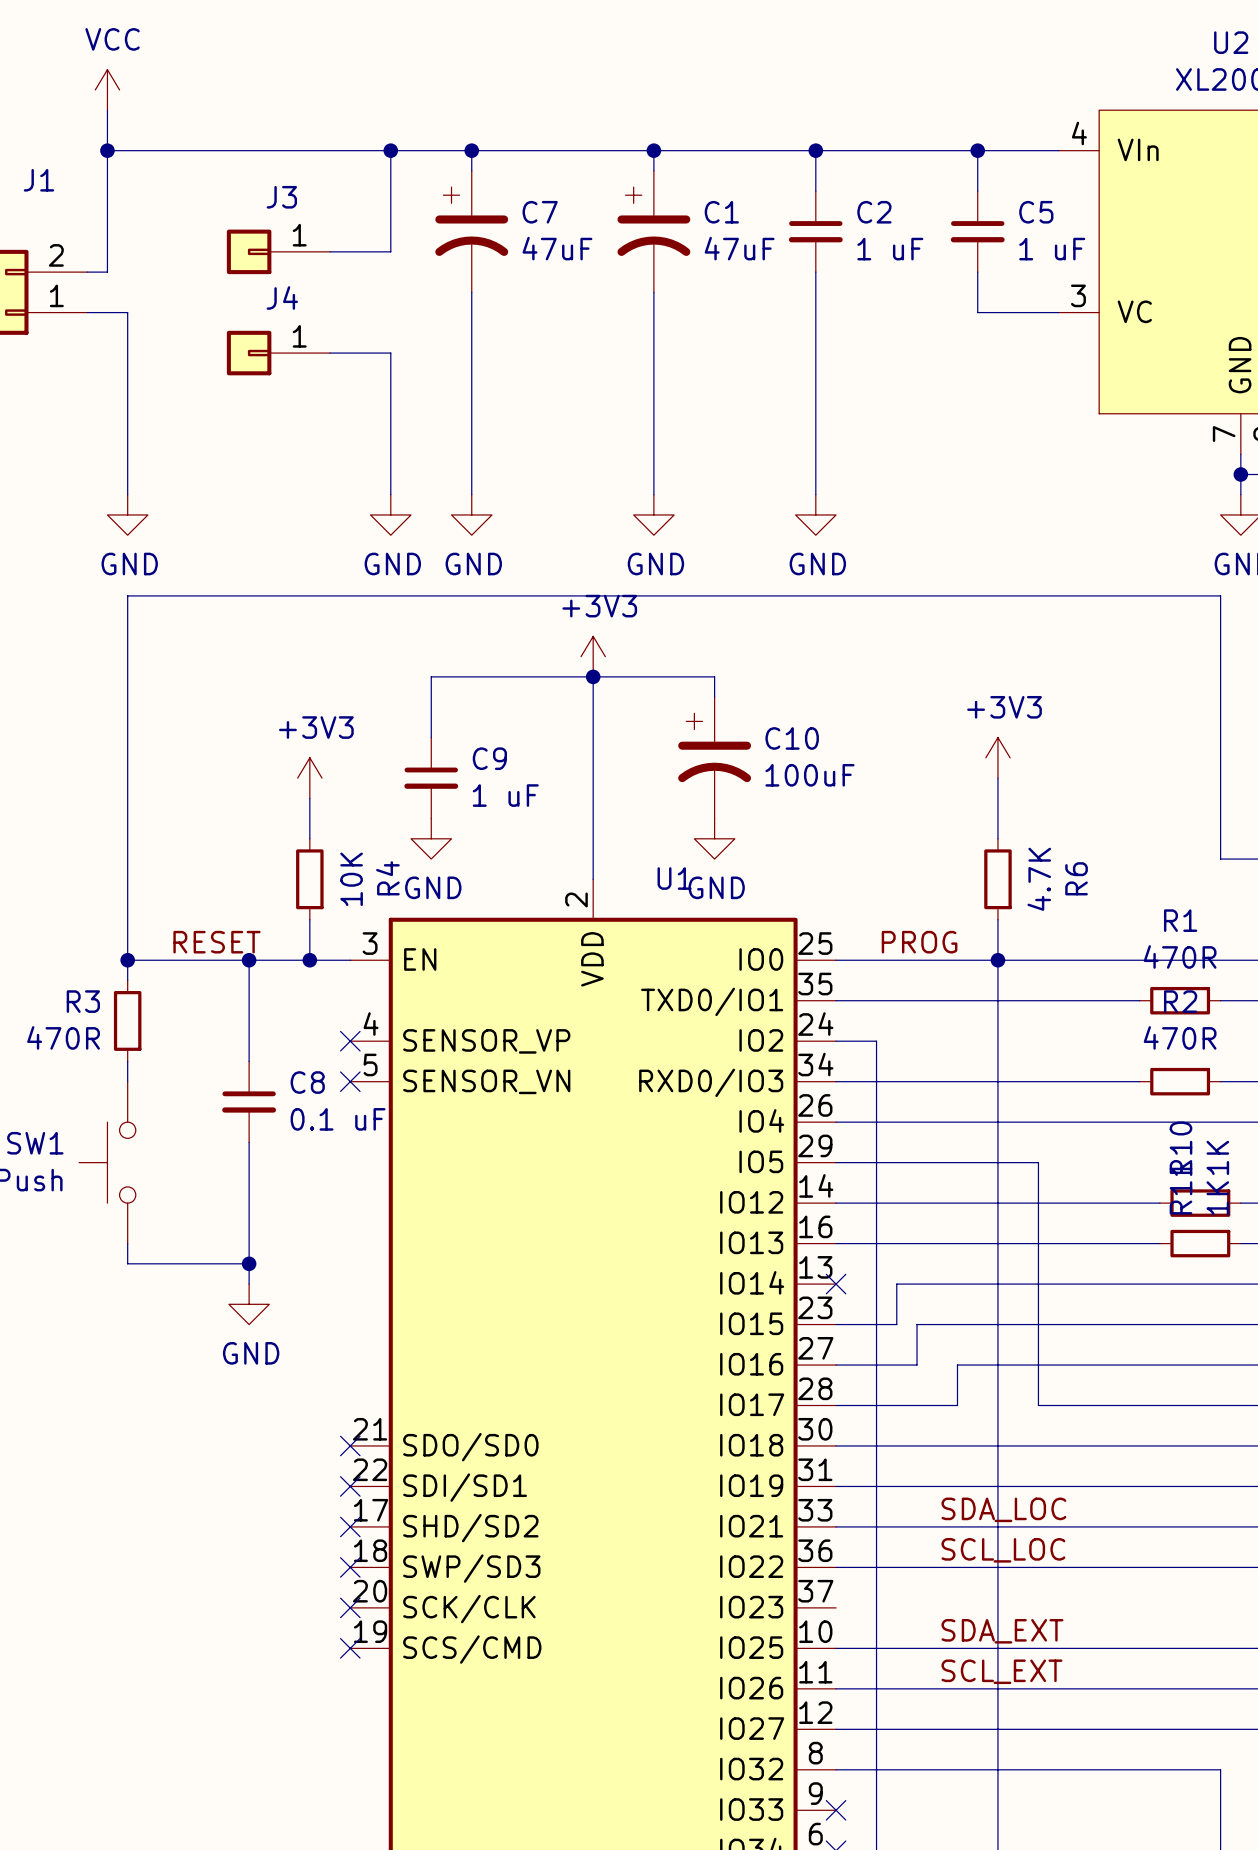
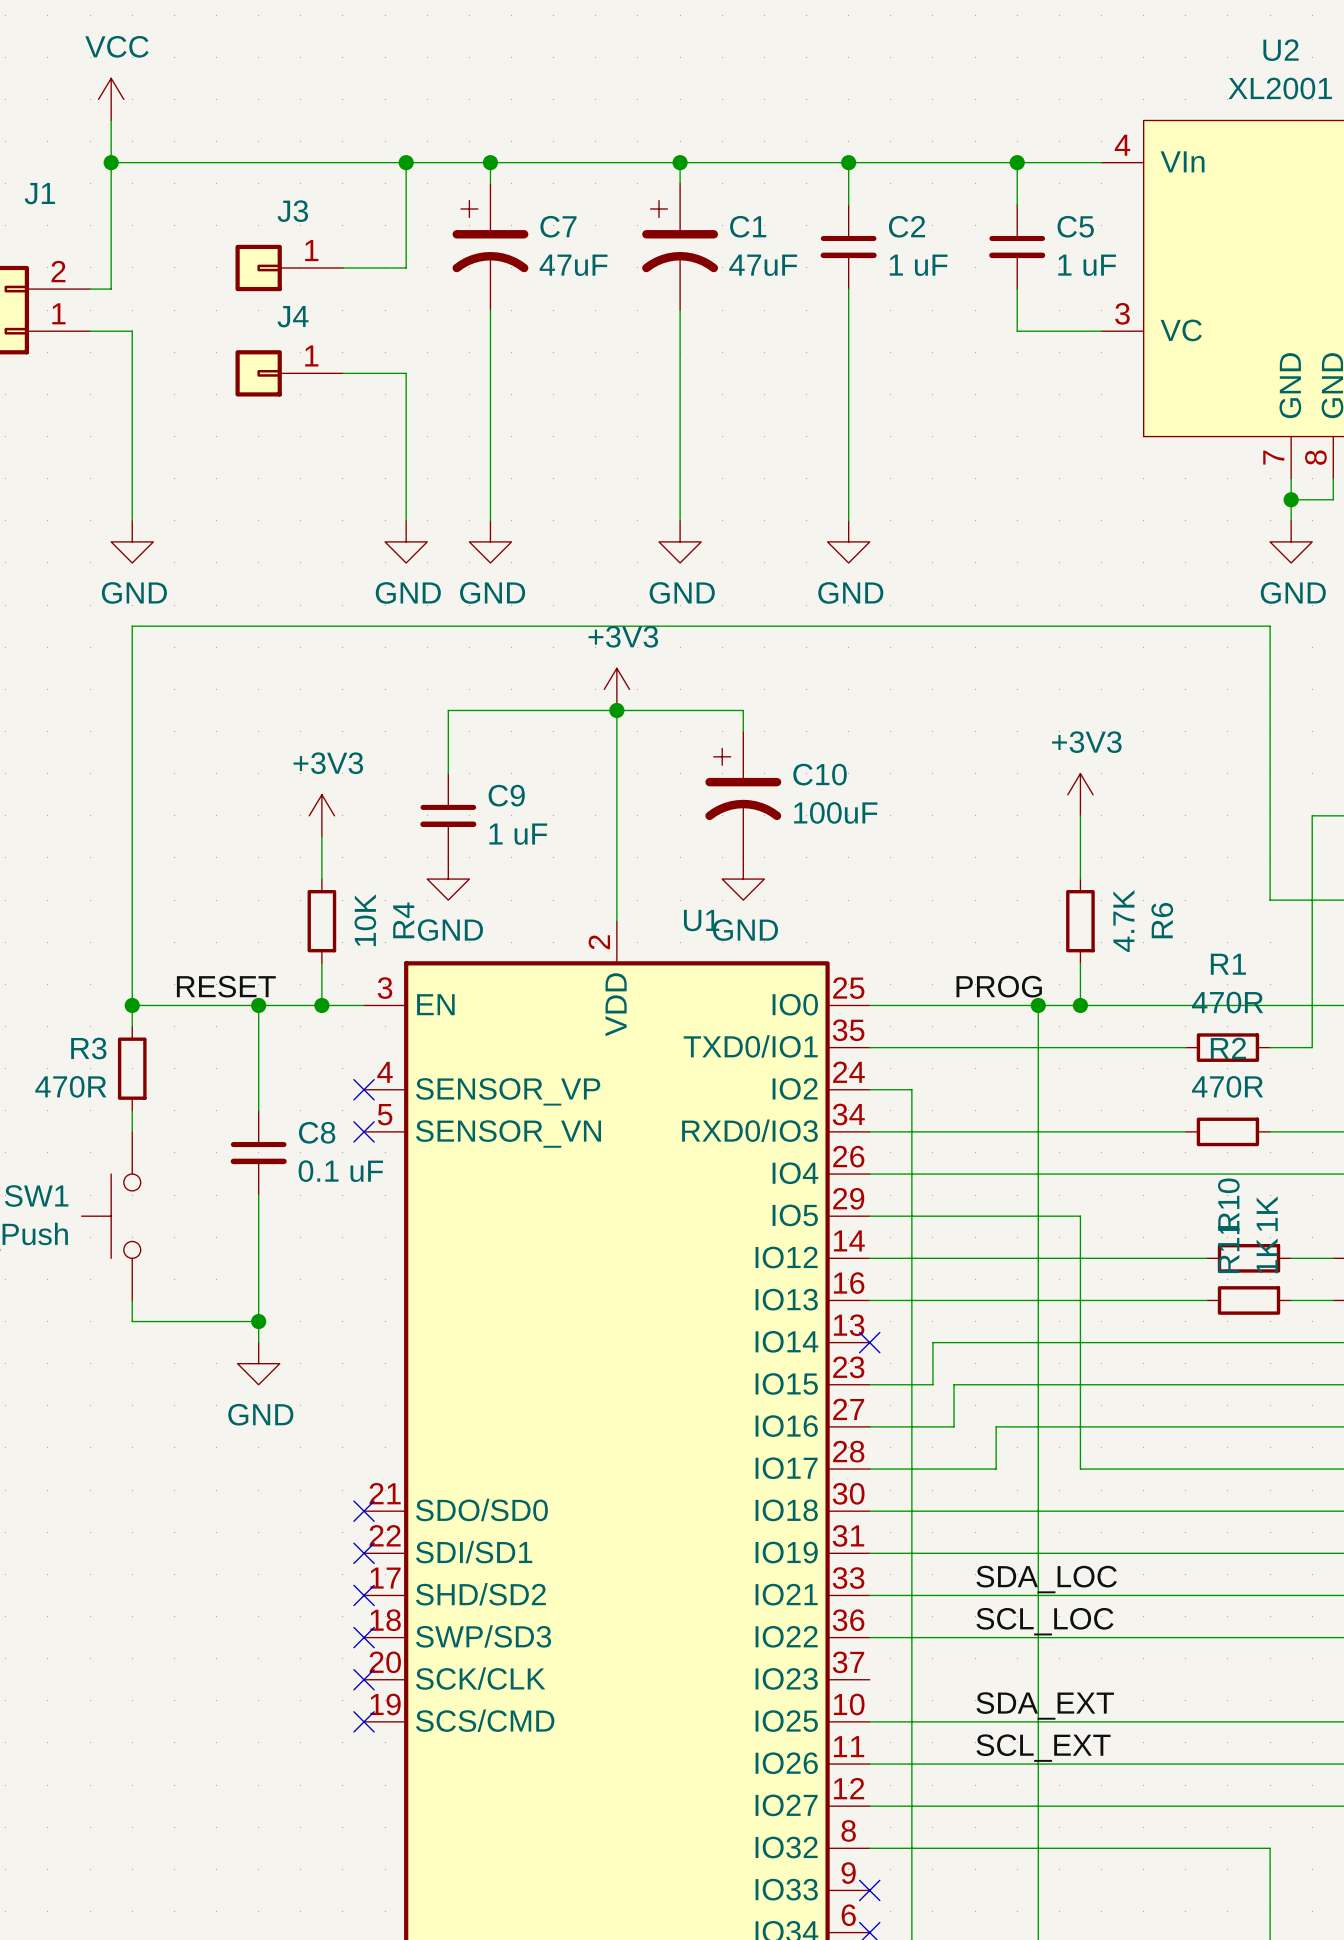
power symbol position: +3V3 (997, 757) -> +3V3 (1080, 794)
wire: (997, 778) (997, 838) -> (1080, 815) (1080, 879)
R6 position: (997, 879) -> (1080, 921)
wire: (997, 919) (997, 960) -> (1080, 963) (1080, 1005)
label position: PROG (919, 942) -> PROG (999, 986)
junction: none -> (1080, 1005)

